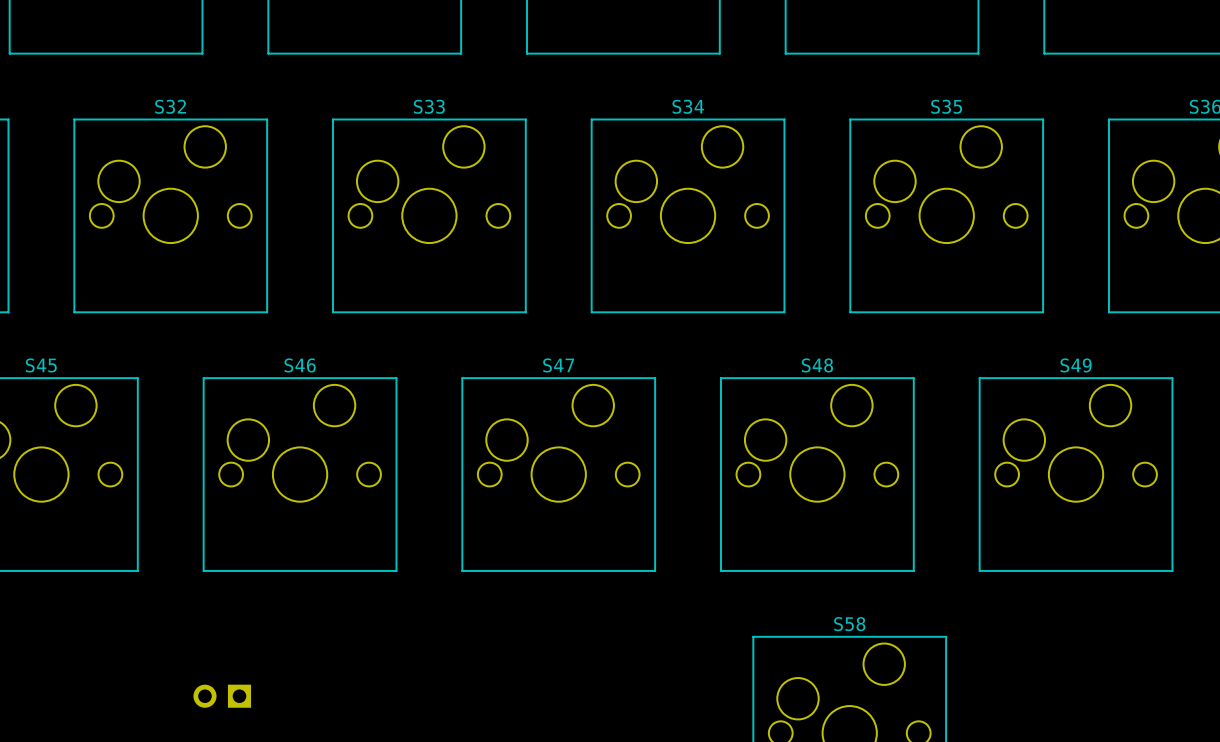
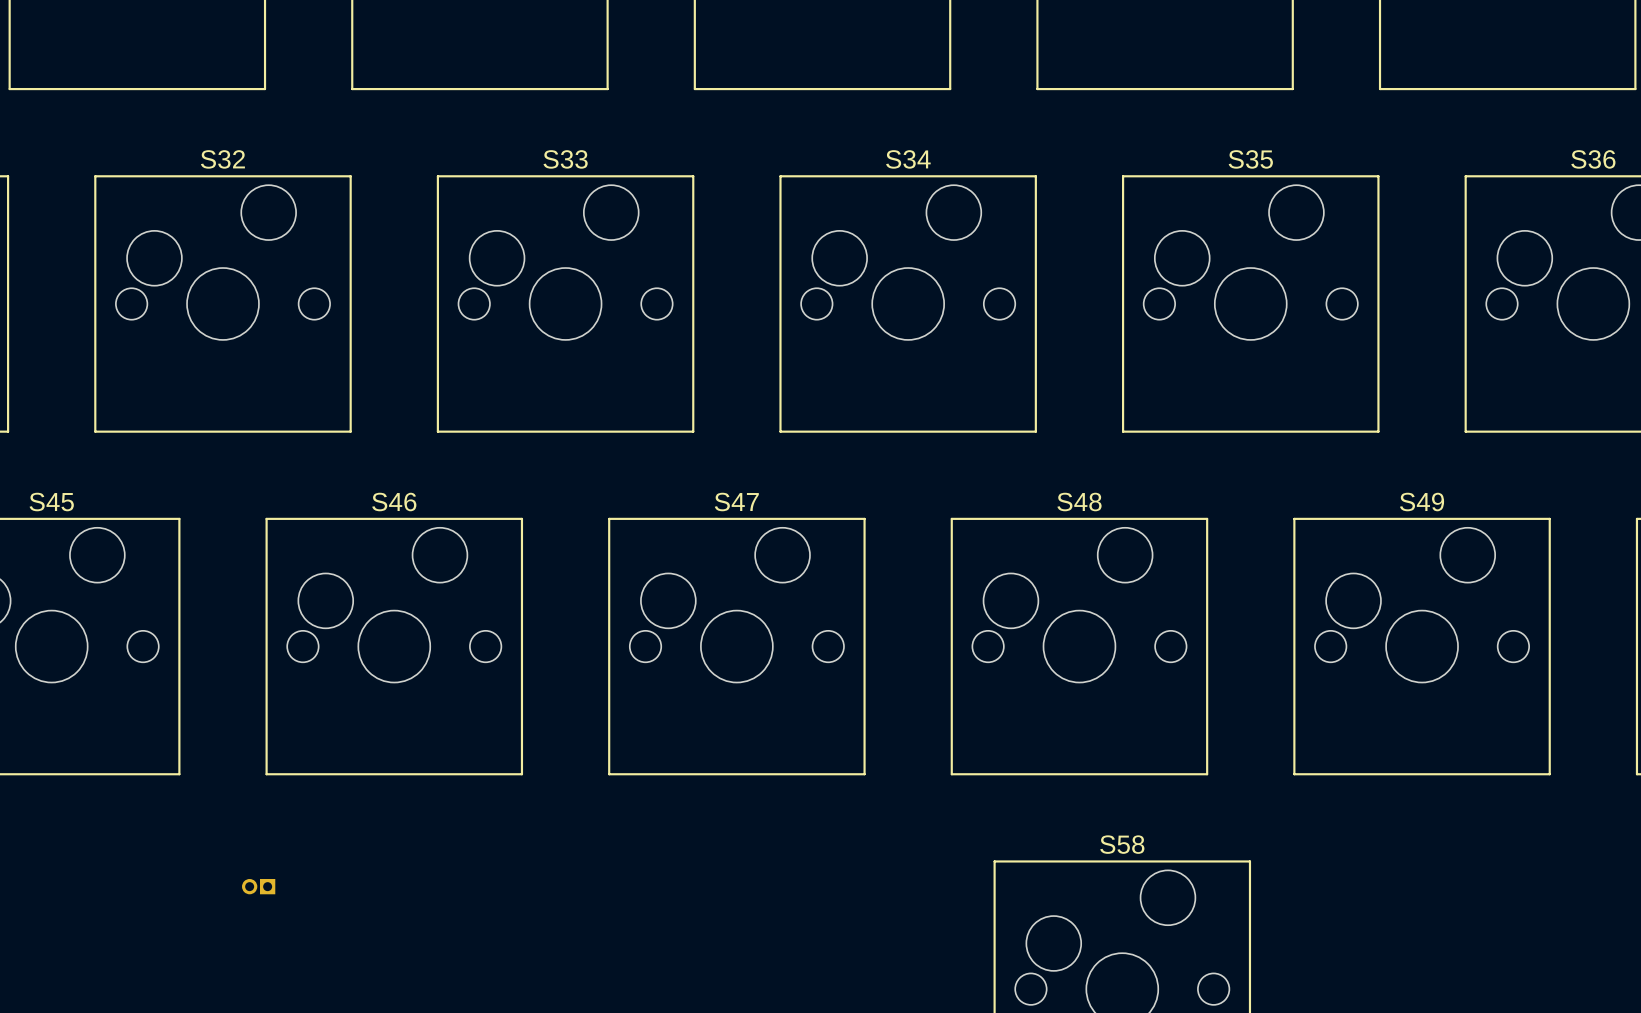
part: none -> (258, 886)
part: (222, 696) -> none

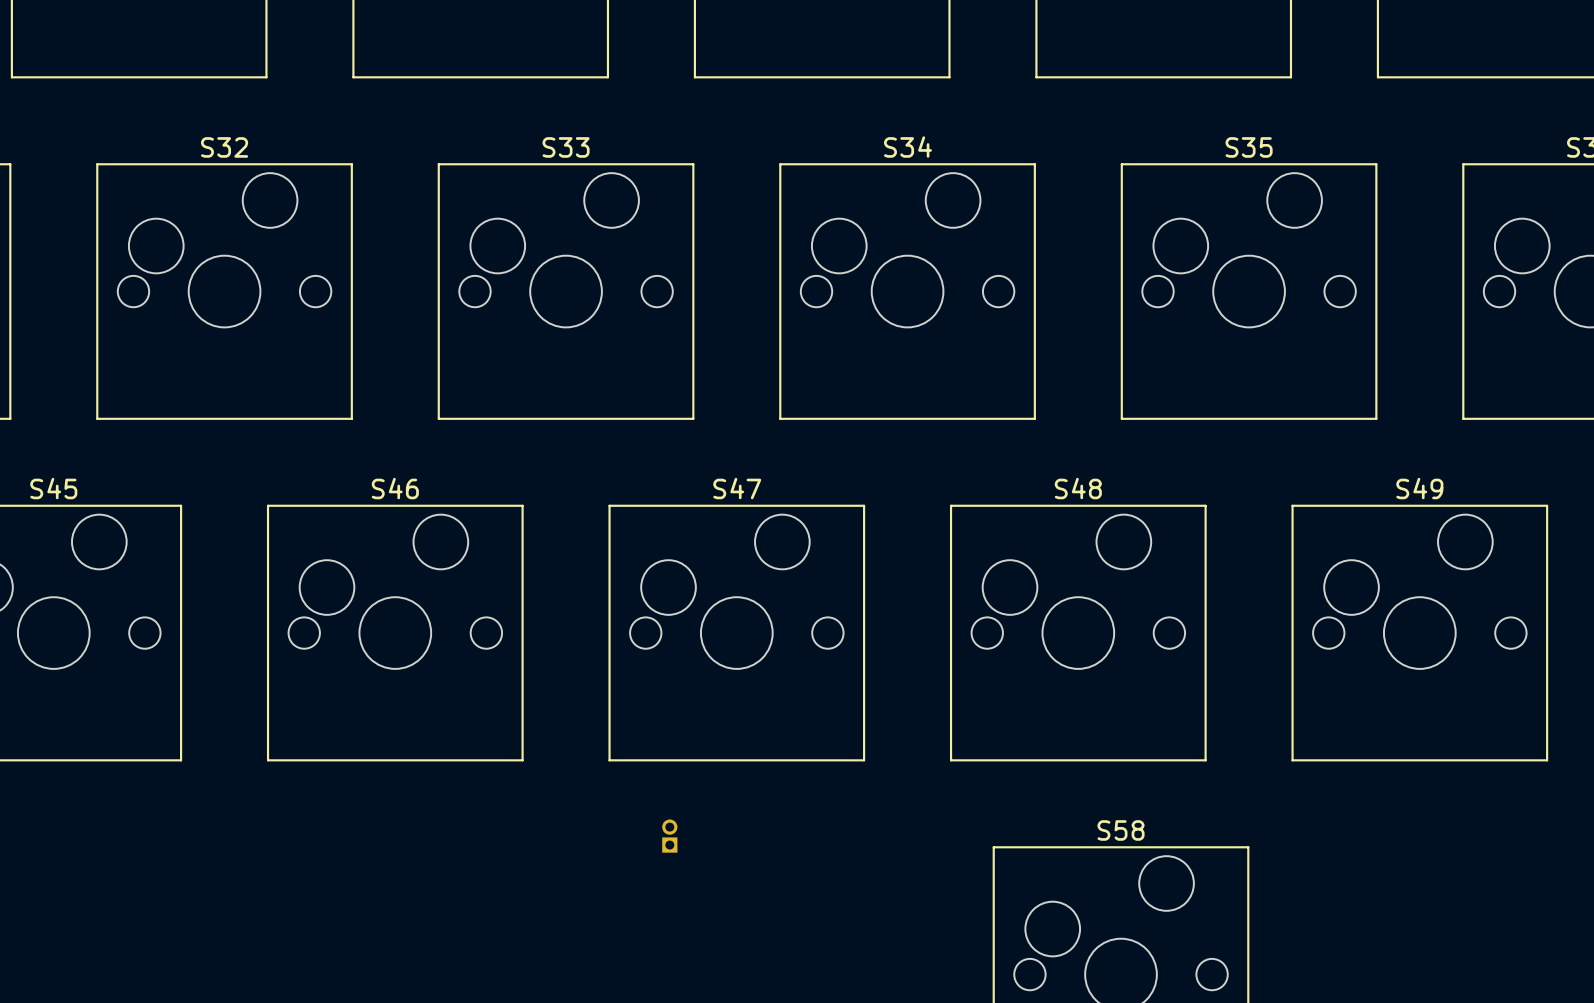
part rotation: 0° (258, 886) -> 90° clockwise (669, 836)
part position: (258, 886) -> (669, 836)

